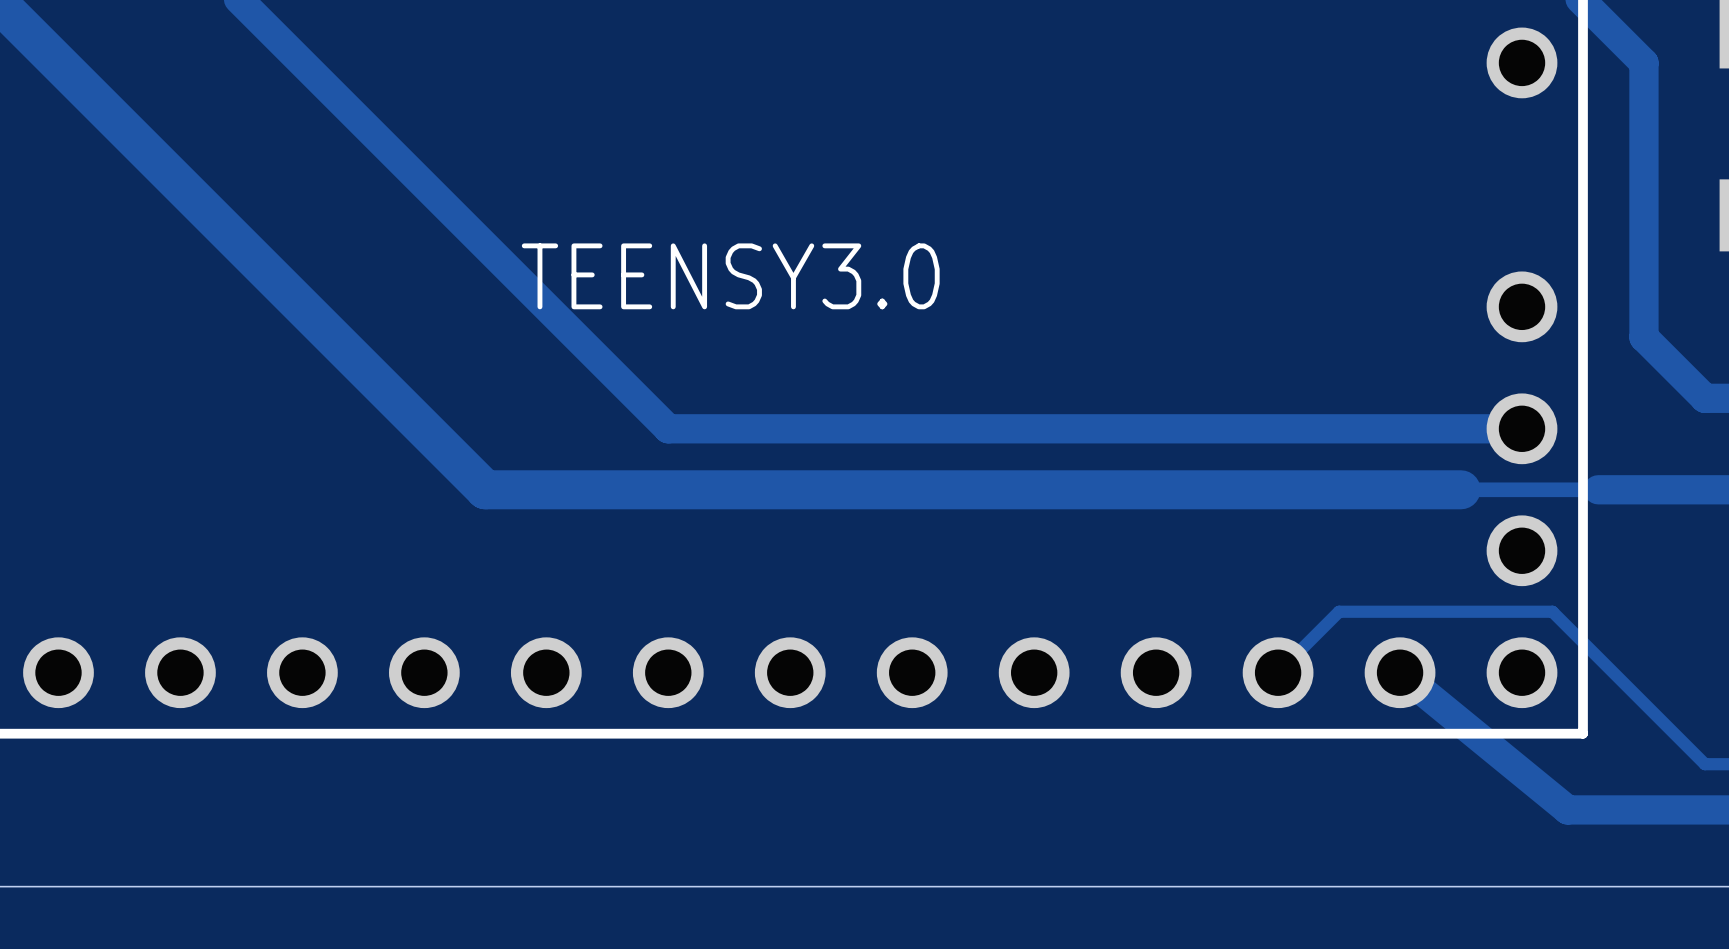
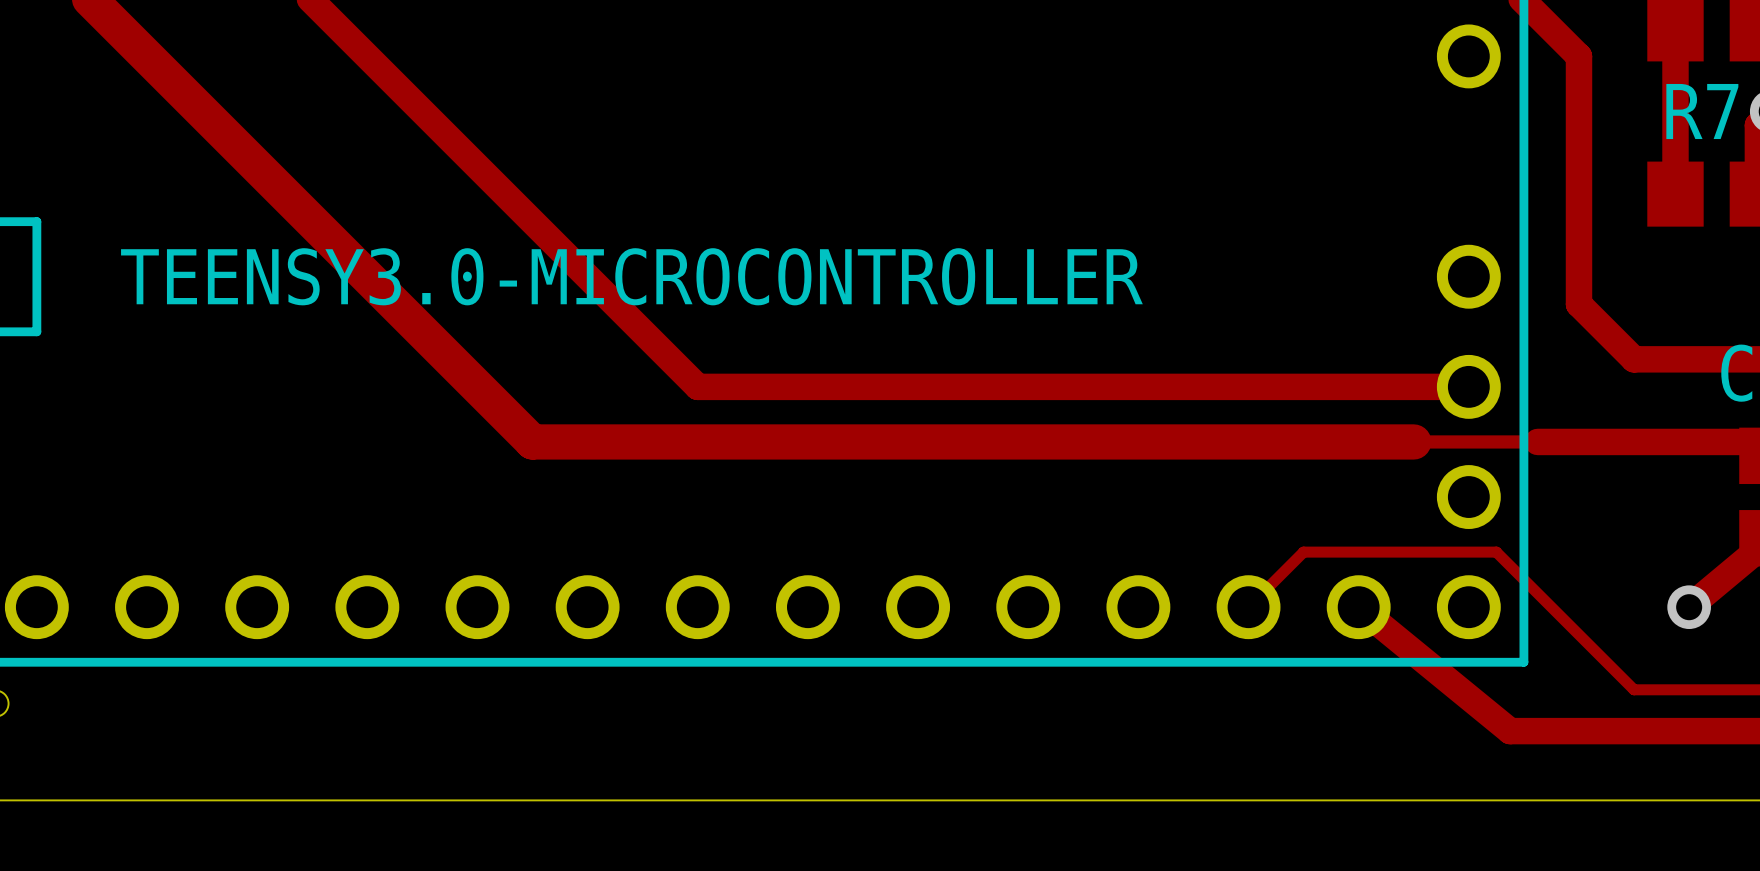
TEENSY3.0 name: TEENSY3.0 (730, 276) -> TEENSY3.0-MICROCONTROLLER (631, 276)

